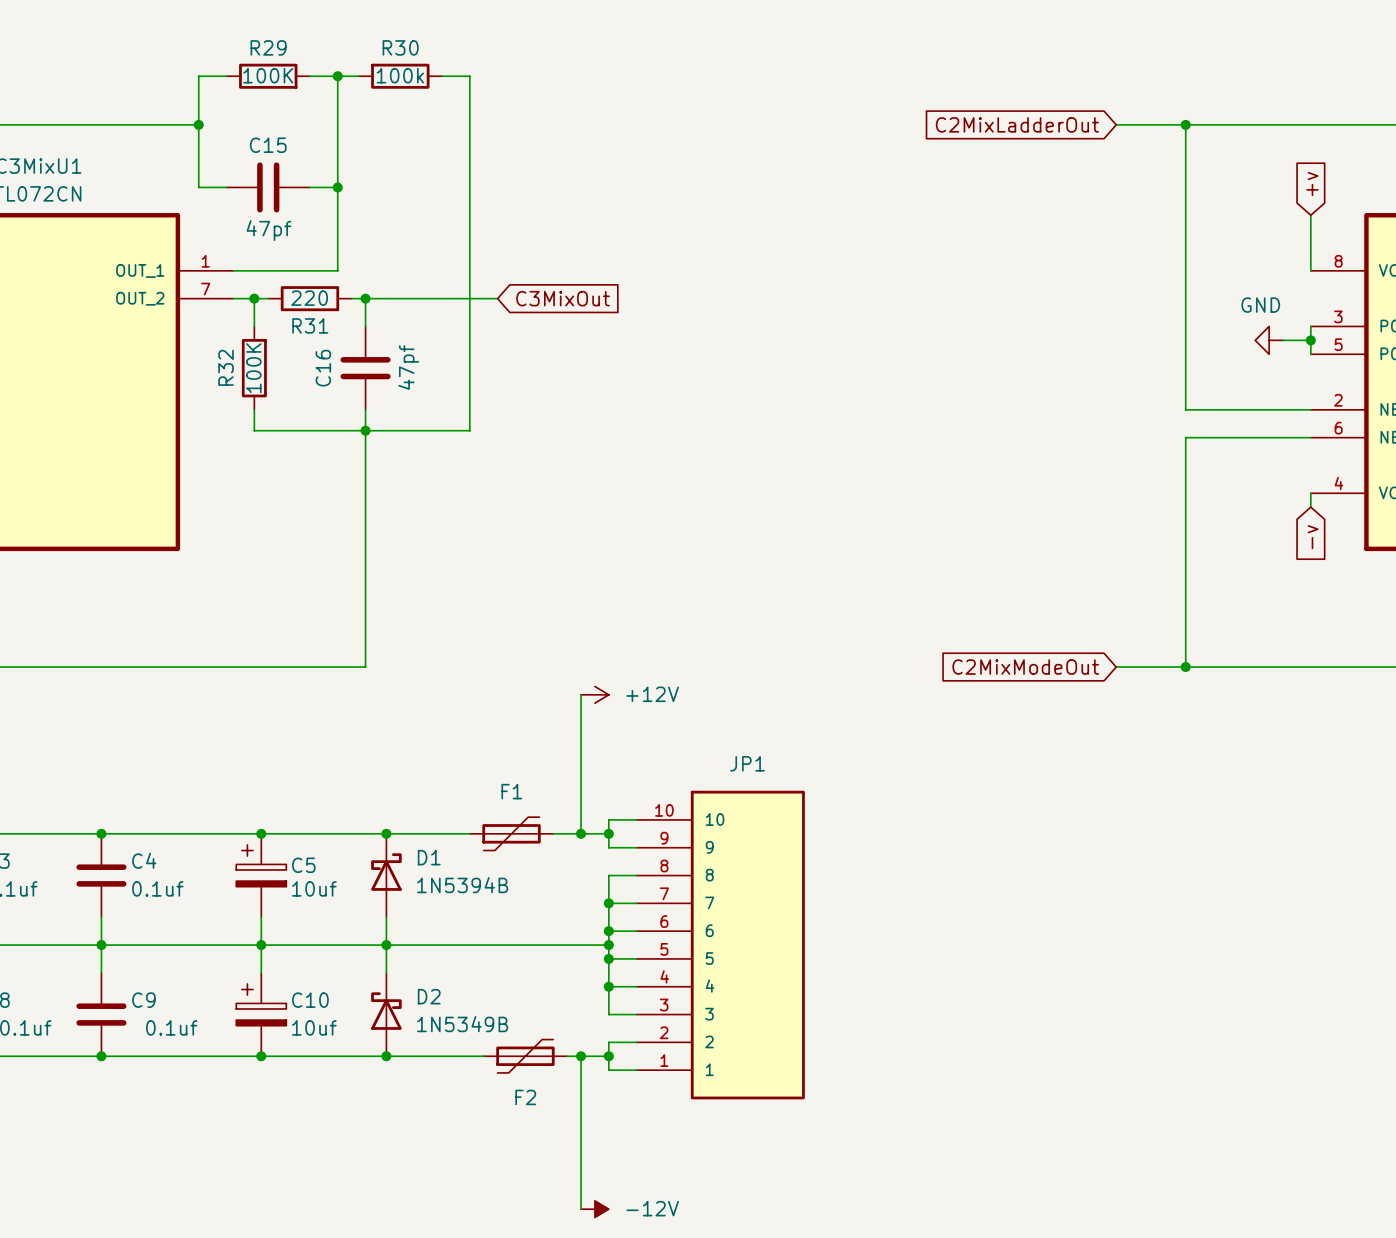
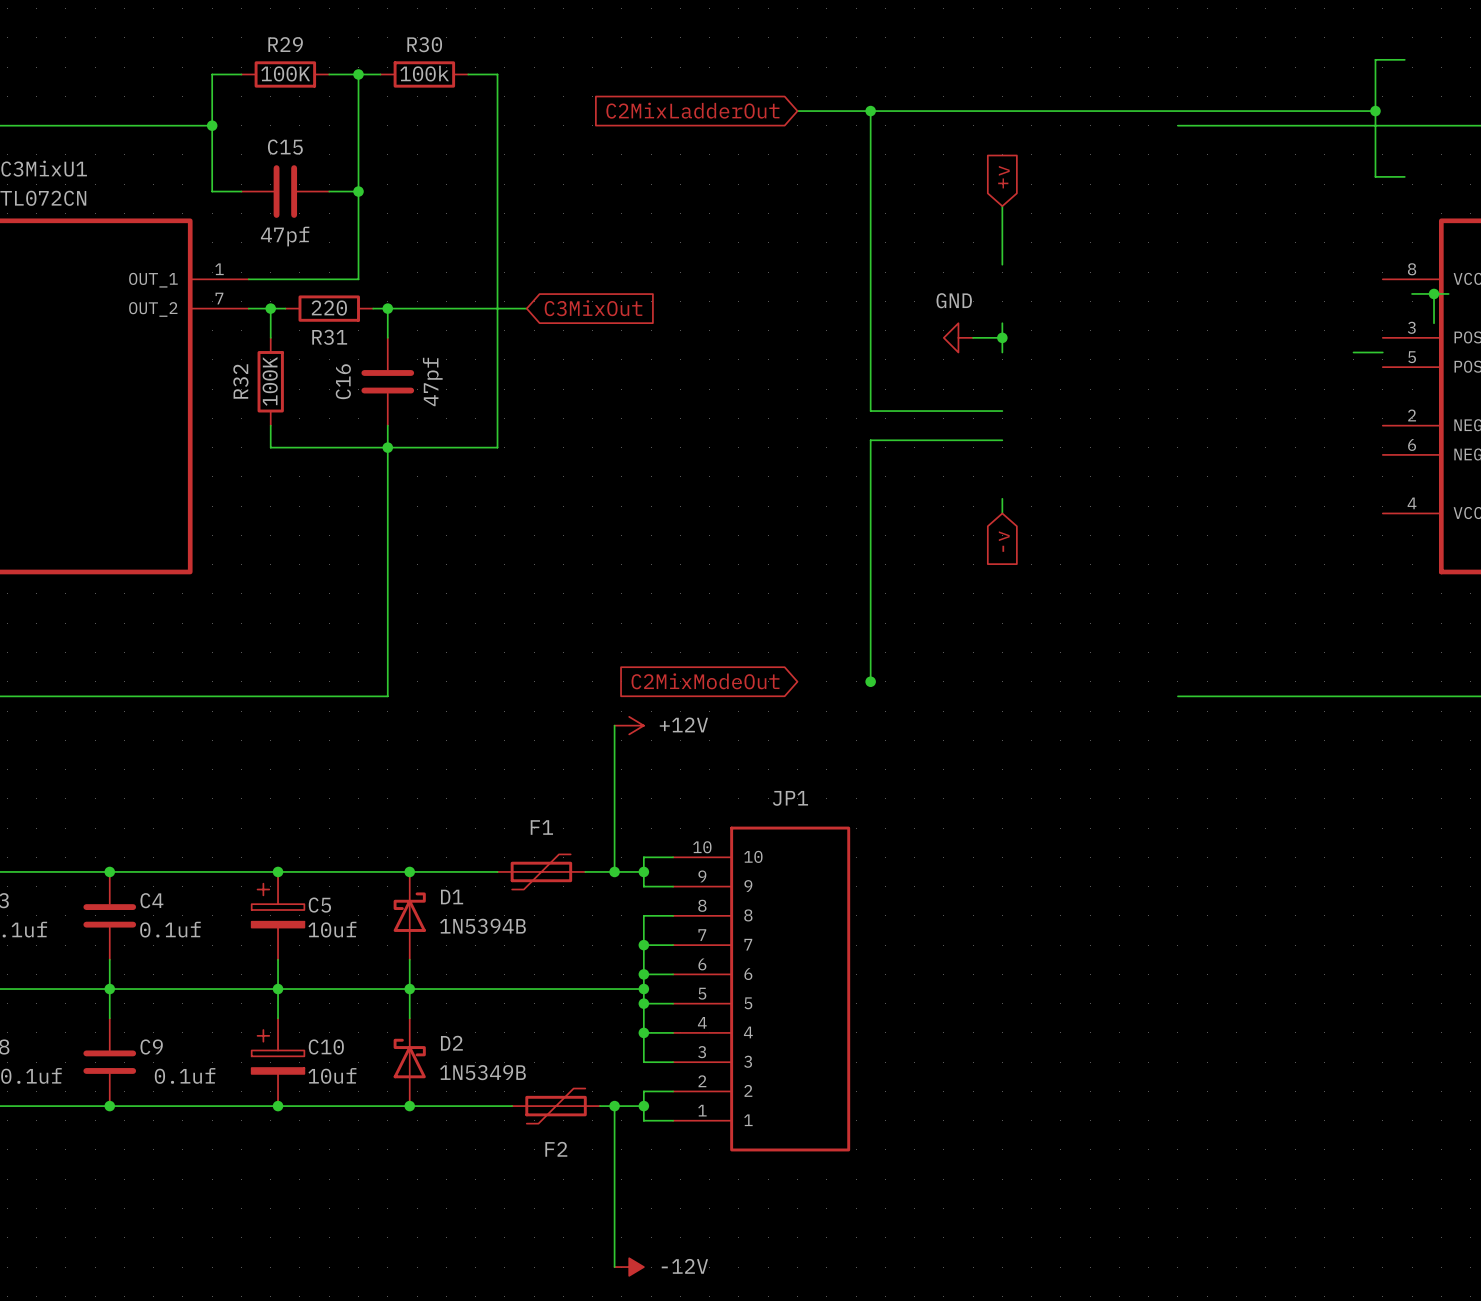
wire: none -> (1404, 59) (1375, 59) (1375, 176) (1404, 176)
global label: none -> C2MixLadderOut (692, 110)
wire: none -> (797, 111) (1375, 111)
wire: none -> (870, 111) (870, 411) (1002, 411)
junction: none -> (870, 111)
junction: none -> (1375, 111)
global label: C2MixLadderOut (1017, 124) -> none
wire: (1185, 124) (1185, 409) (1310, 409) -> none
junction: (1185, 124) -> none
global label: none -> +v (1003, 177)
global label: +v (1312, 183) -> none
wire: none -> (1002, 206) (1002, 264)
wire: (1310, 215) (1310, 270) -> none
wire: none -> (1412, 293) (1448, 293)
junction: none -> (1434, 293)
wire: none -> (1002, 323) (1002, 352)
power symbol: none -> GND (958, 337)
wire: none -> (973, 337) (1002, 337)
junction: none -> (1002, 337)
wire: (1310, 326) (1310, 354) -> (1434, 293) (1434, 323)
power symbol: GND (1269, 340) -> none
junction: (1310, 340) -> none
wire: none -> (1002, 440) (870, 440) (870, 681)
wire: (1310, 437) (1185, 437) (1185, 667) -> none
wire: none -> (1002, 498) (1002, 513)
wire: (1310, 493) (1310, 507) -> none
global label: none -> -v (1004, 541)
global label: -v (1313, 537) -> none
global label: none -> C2MixModeOut (705, 681)
junction: none -> (870, 681)
global label: C2MixModeOut (1025, 667) -> none
junction: (1185, 667) -> none

